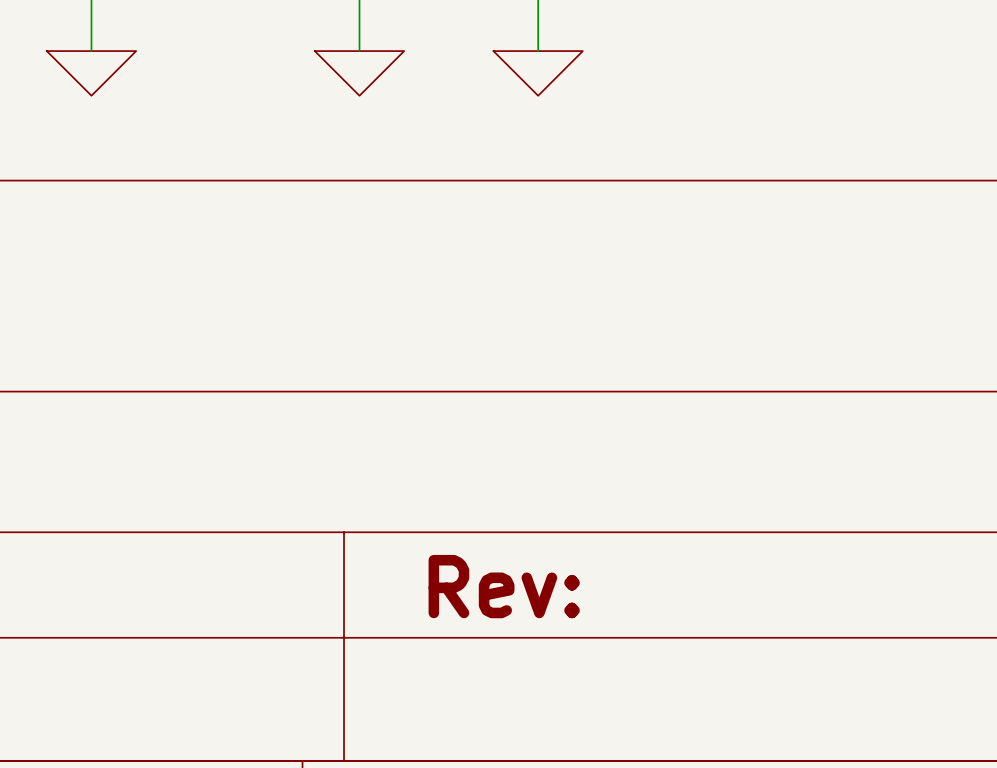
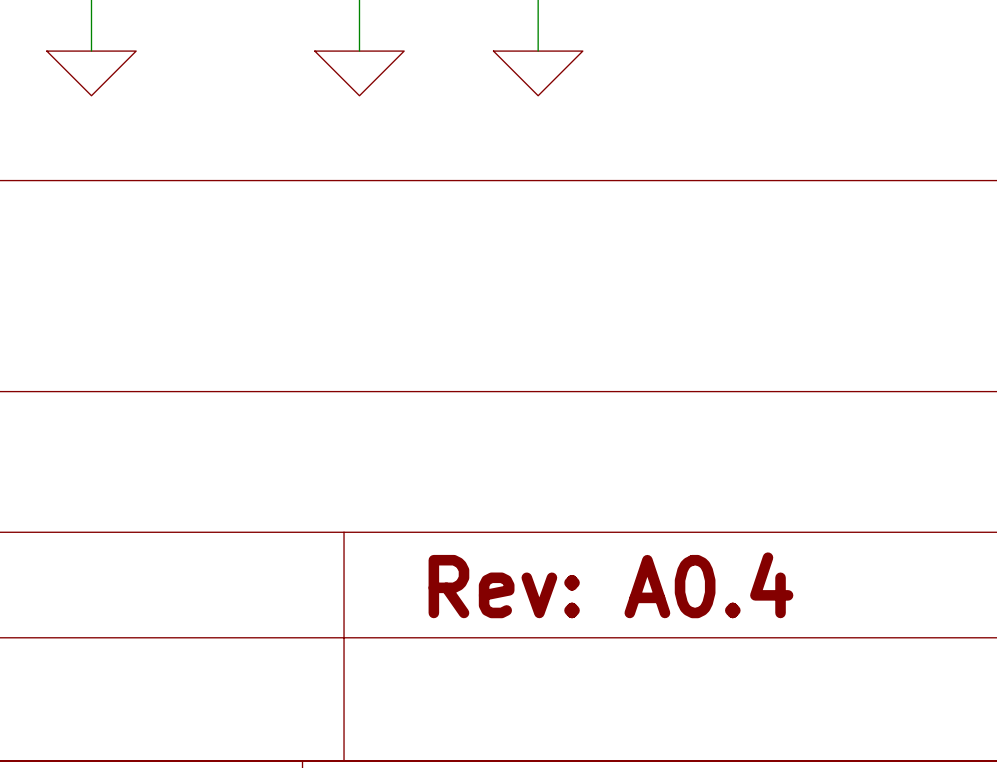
title block: Rev: (504, 586) -> Rev: A0.4 (610, 585)

